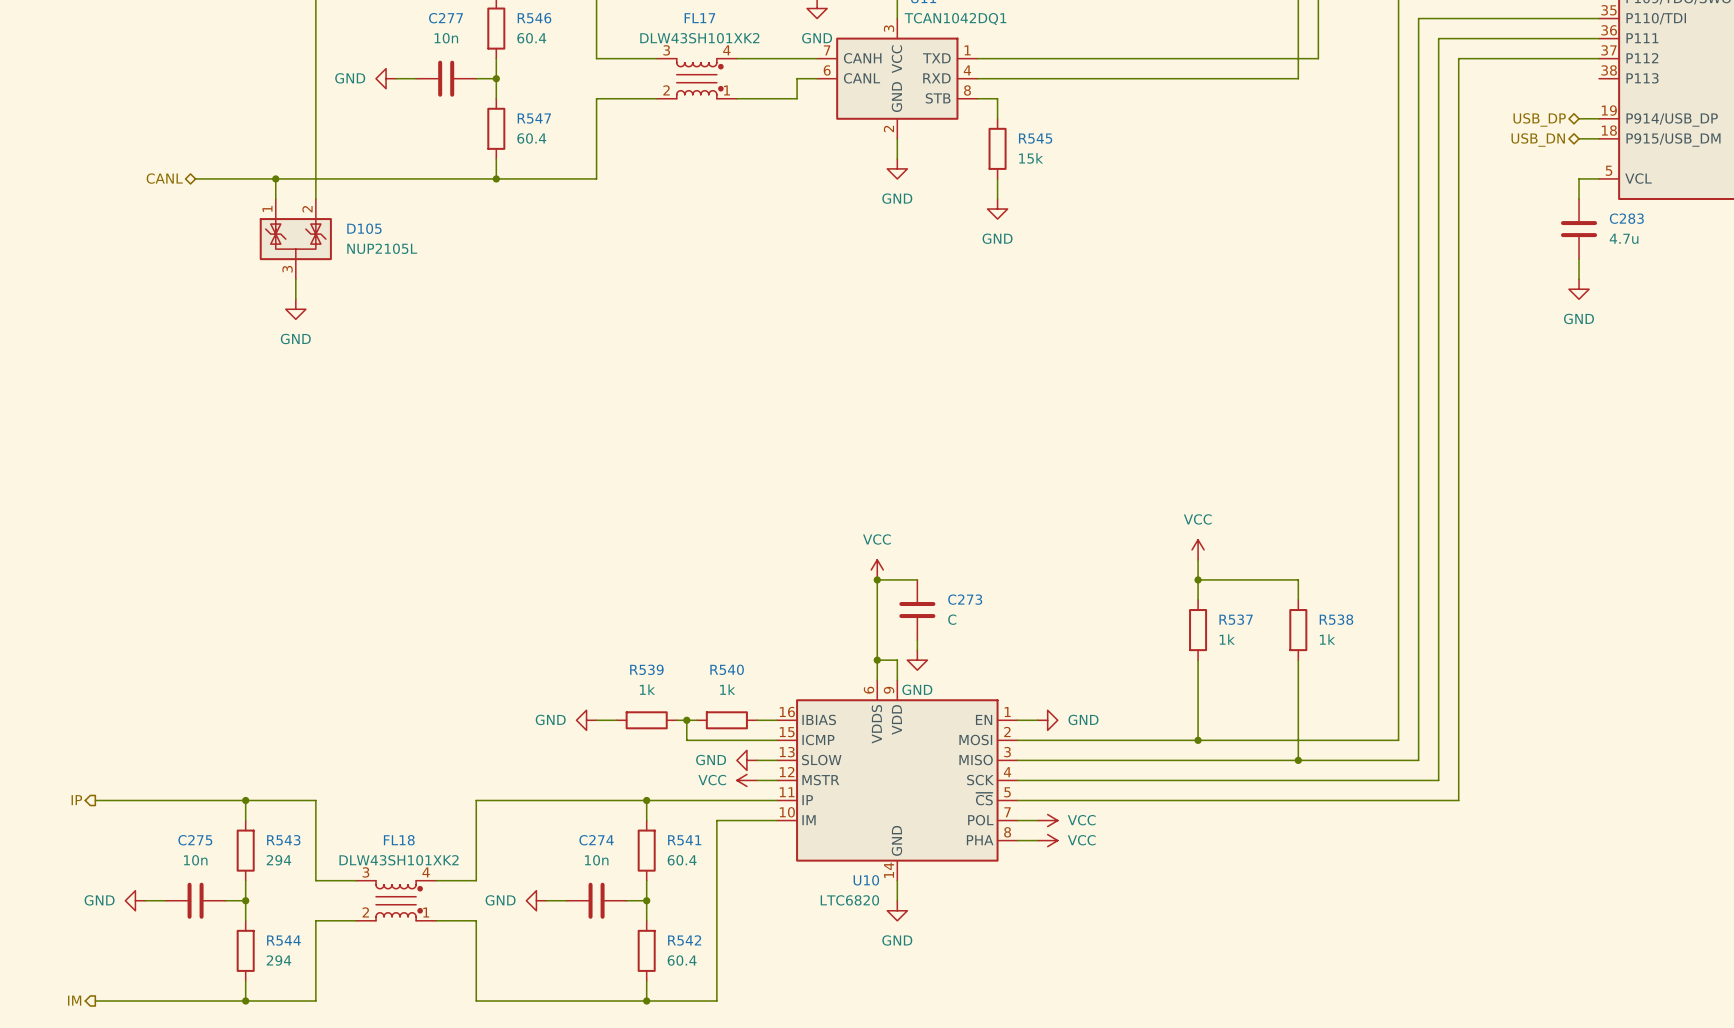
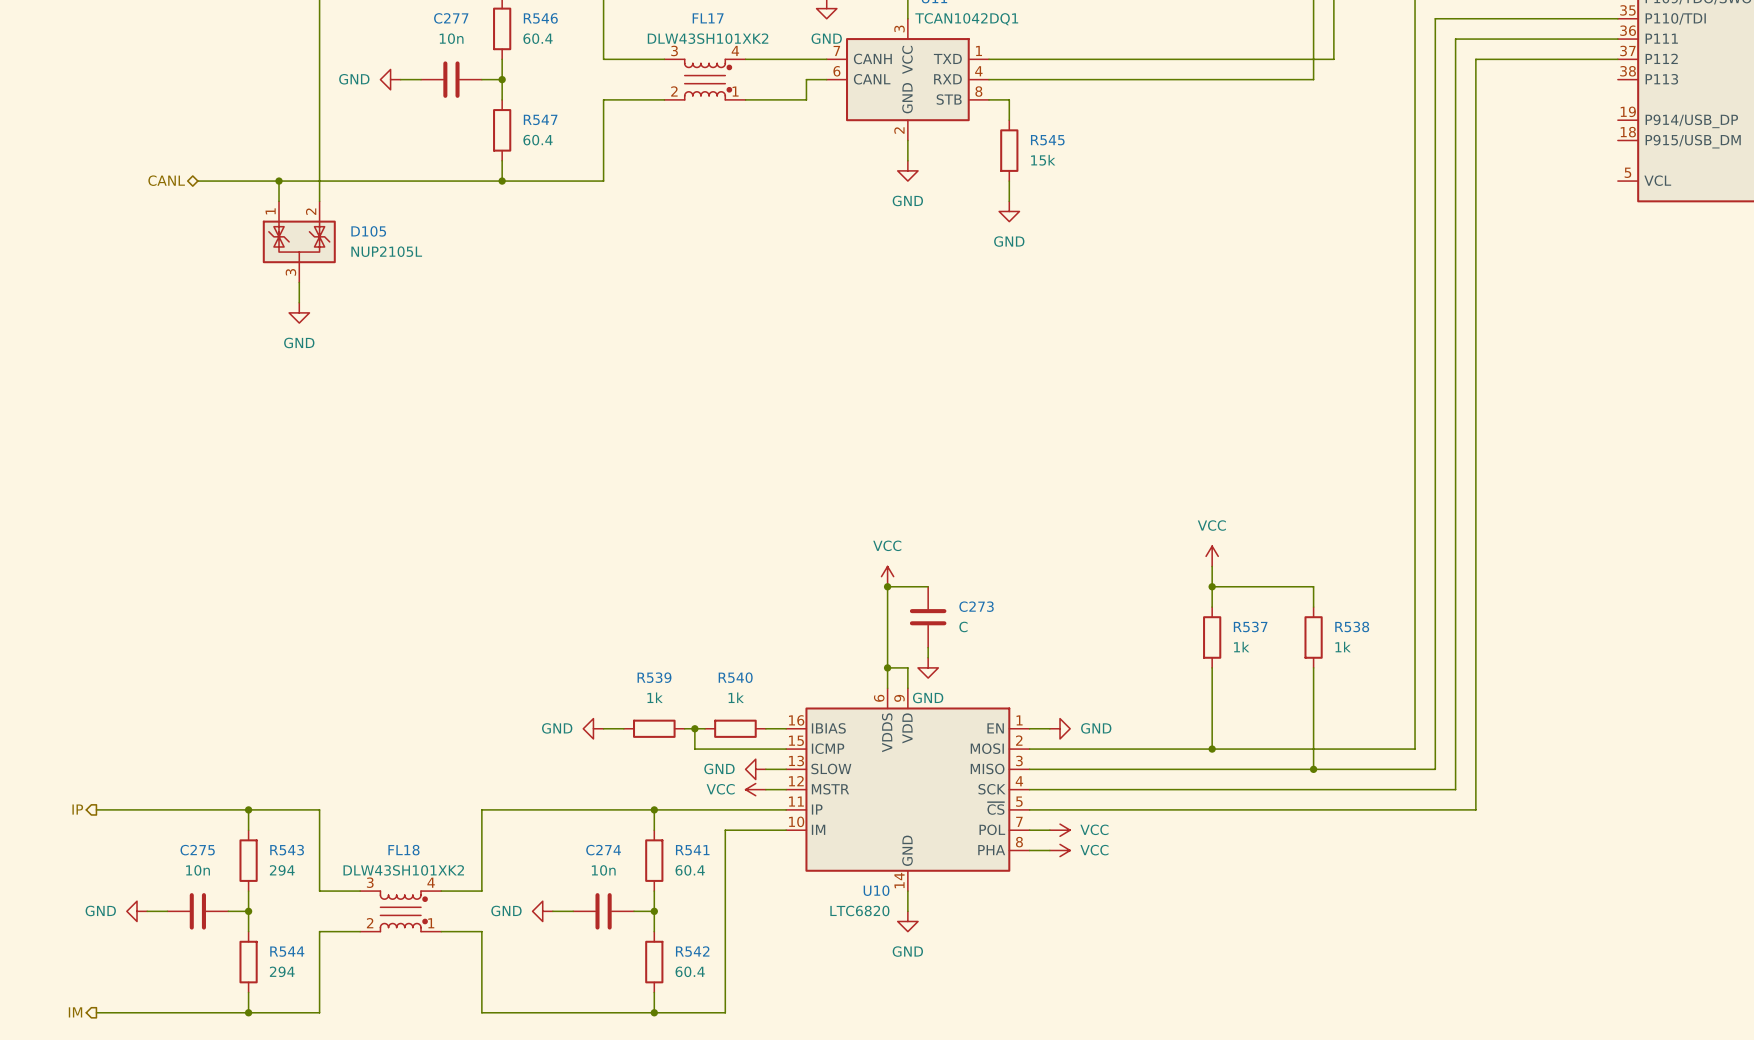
wire: (1579, 118) (1599, 118) -> none
hierarchical label: USB_DP (1539, 119) -> none
wire: (1579, 138) (1599, 138) -> none
hierarchical label: USB_DN (1538, 140) -> none
wire: (1599, 178) (1579, 178) (1579, 199) -> none
C283: 4.7u (1579, 229) -> none
wire: (1579, 259) (1579, 279) -> none
power symbol: GND (1579, 289) -> none

